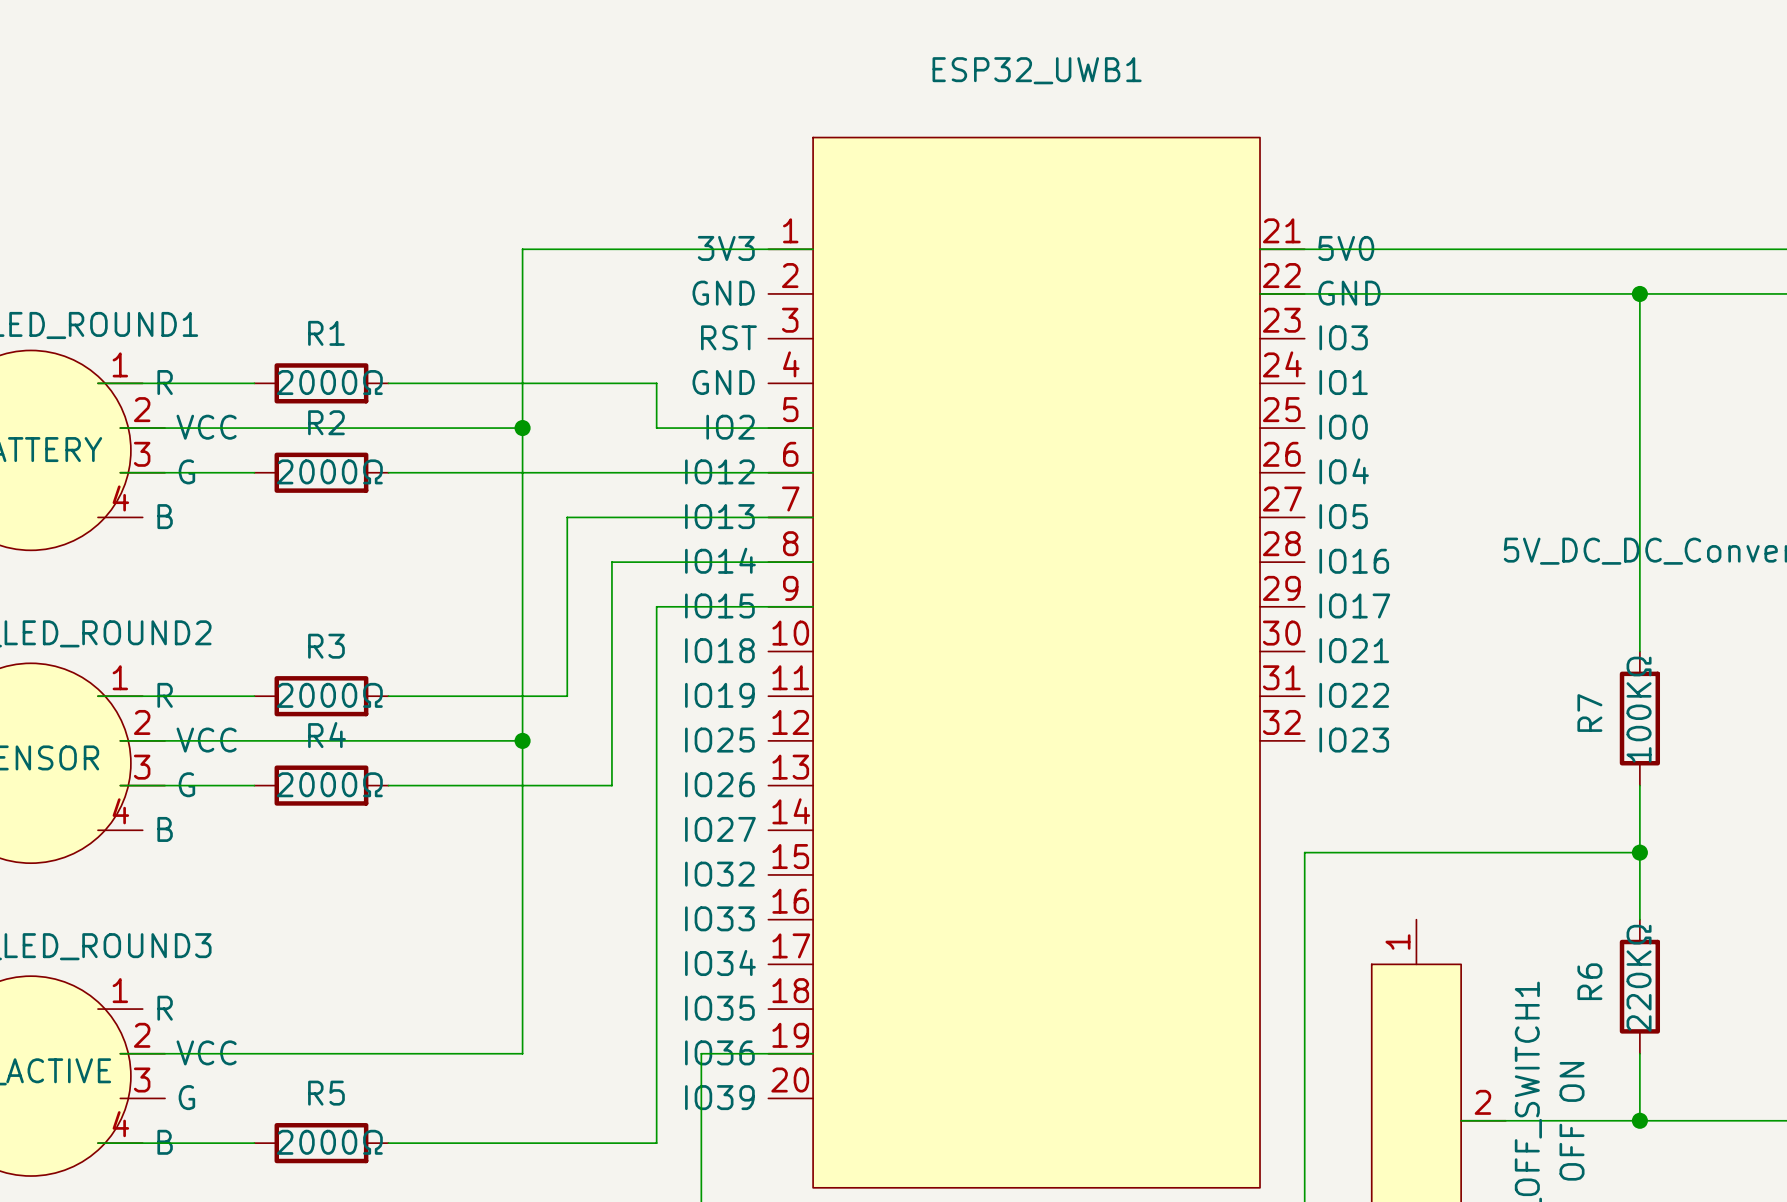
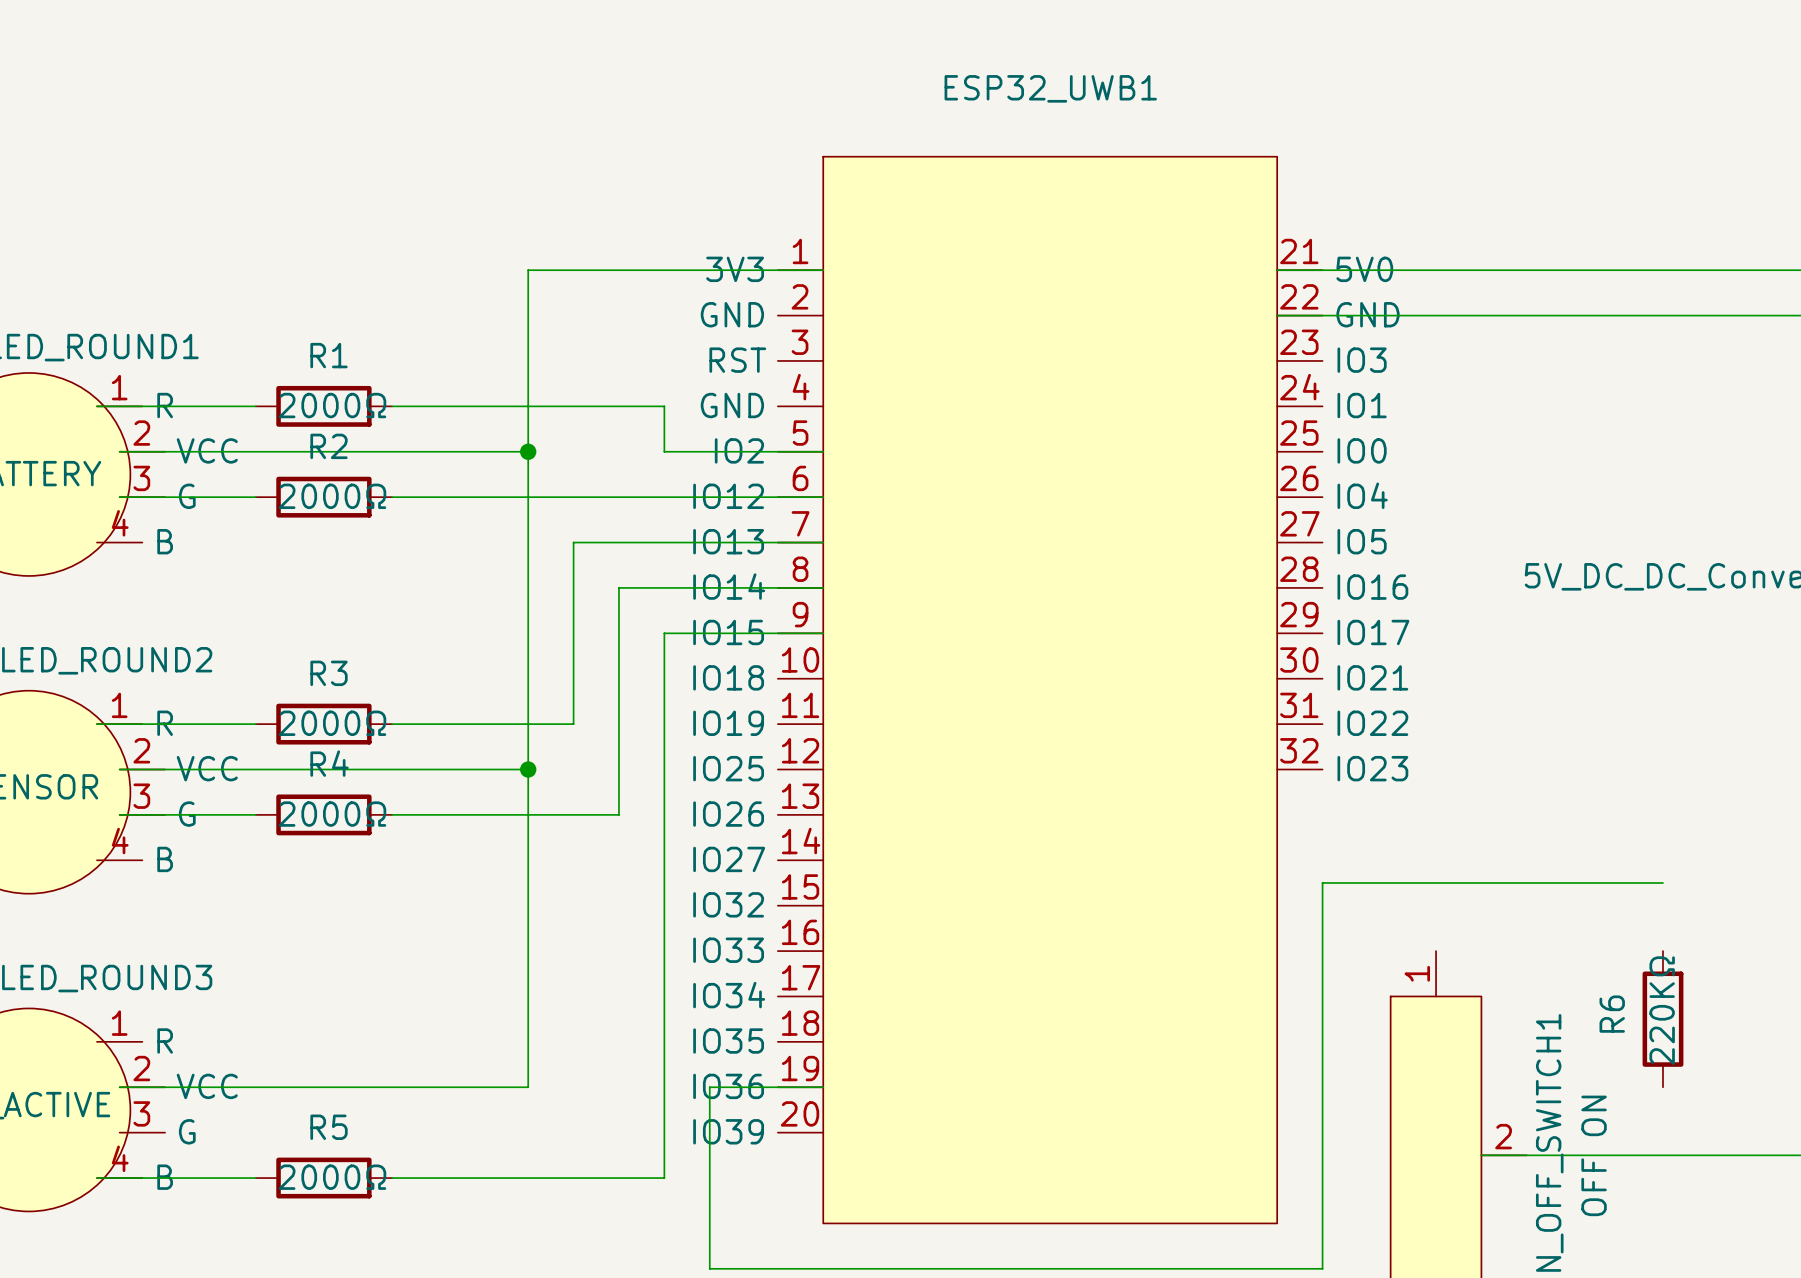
wire: (1639, 293) (1639, 651) -> none
junction: (1639, 293) -> none
R7: 100KΩ (1639, 718) -> none
wire: (1639, 785) (1639, 919) -> none
junction: (1639, 852) -> none
wire: (1639, 1053) (1639, 1120) -> none
junction: (1639, 1120) -> none

